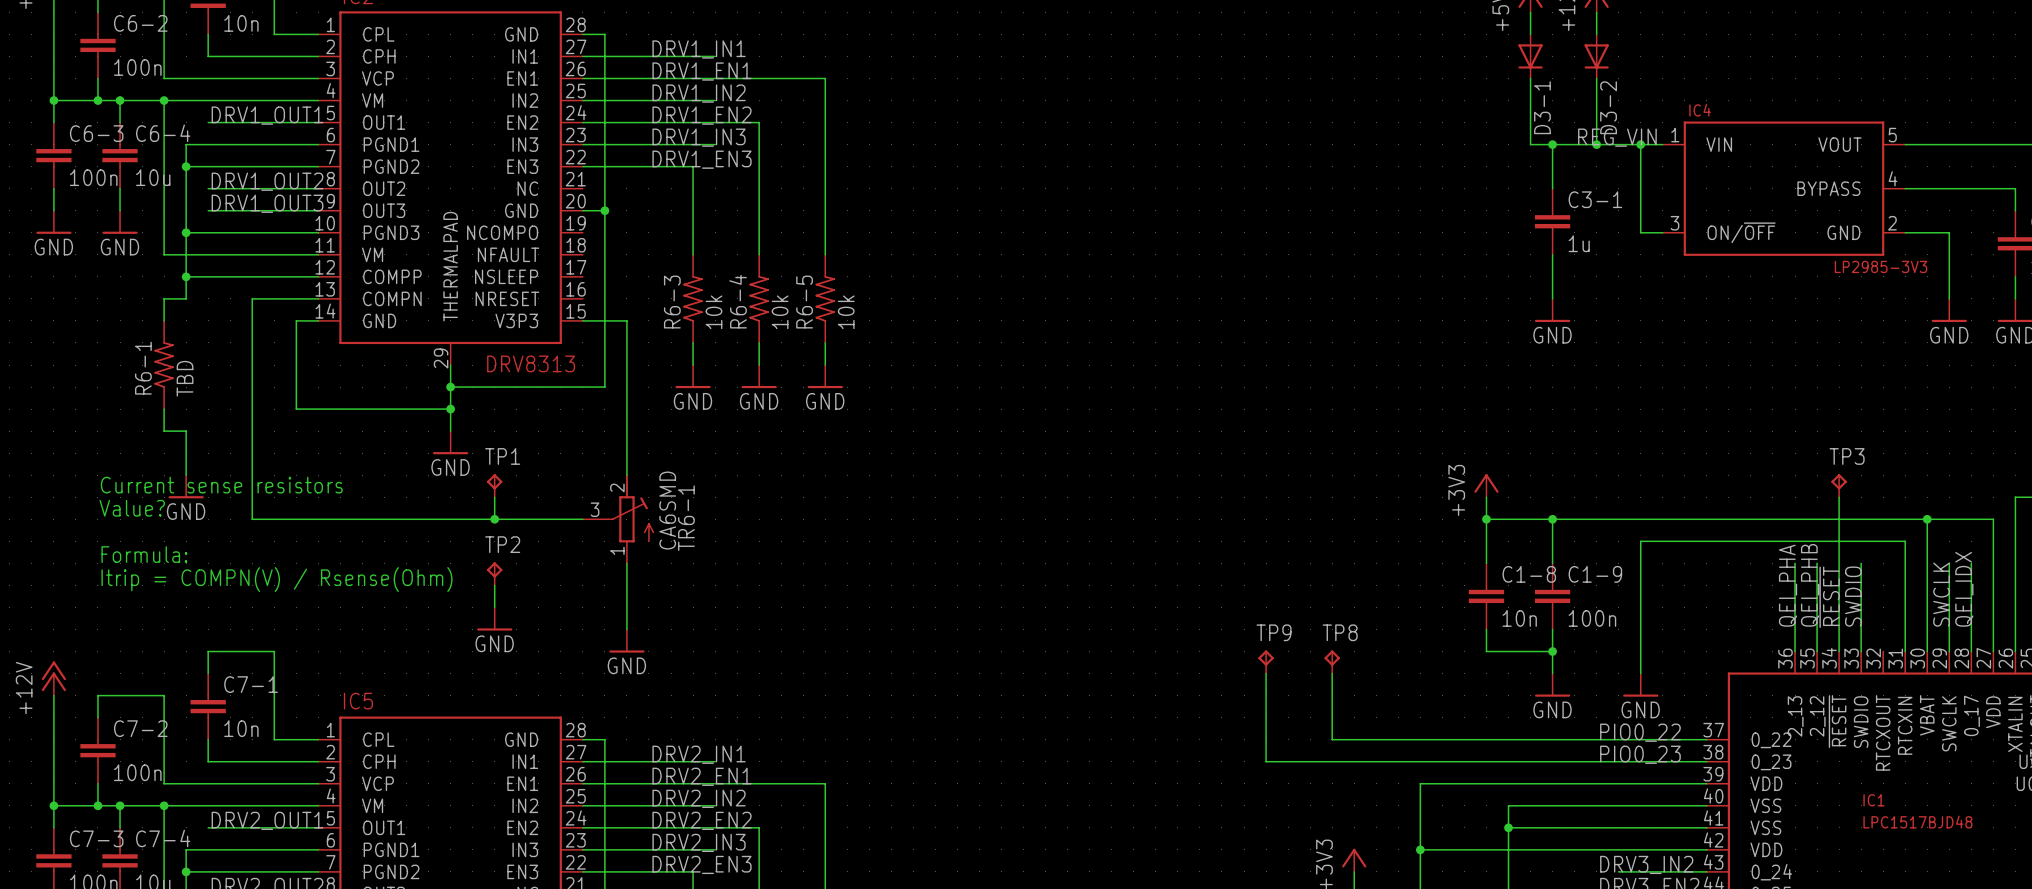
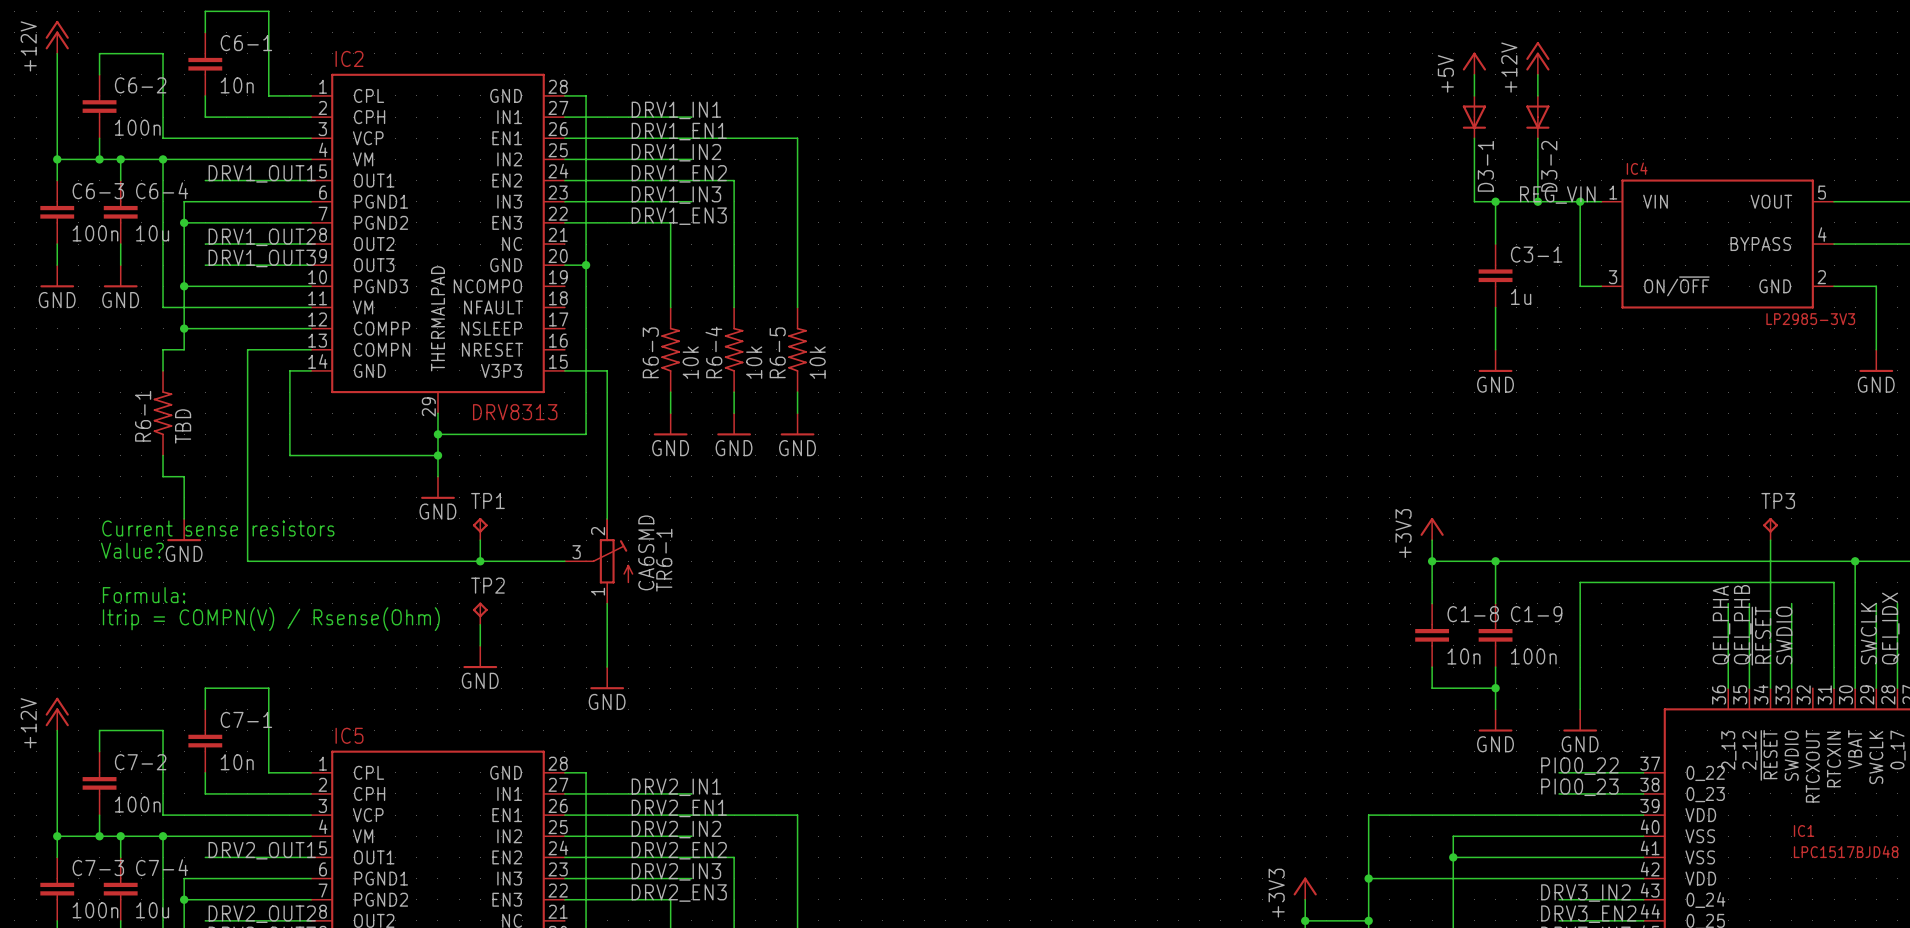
TP9: (1266, 661) -> none
TP8: (1332, 661) -> none
wire: (1266, 673) (1266, 761) (1618, 761) -> none
wire: (1332, 673) (1332, 739) (1618, 739) -> none

